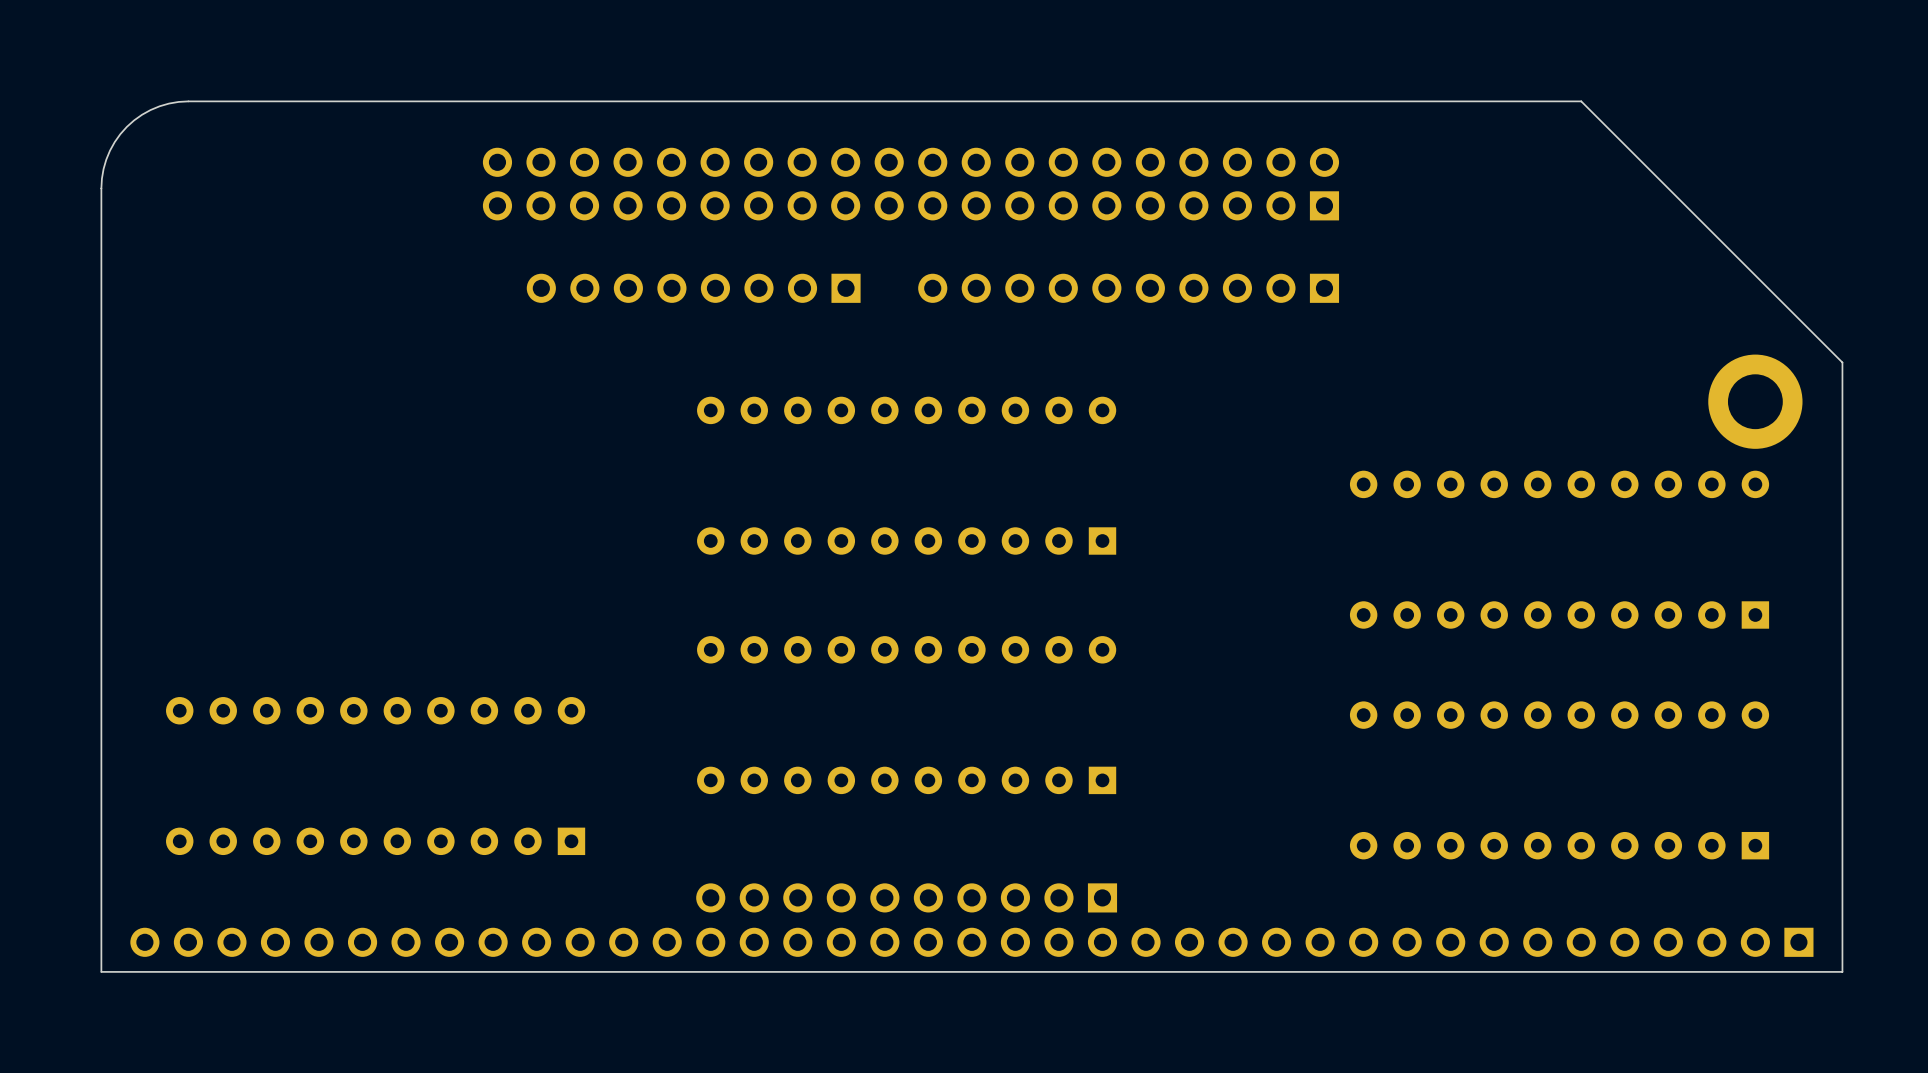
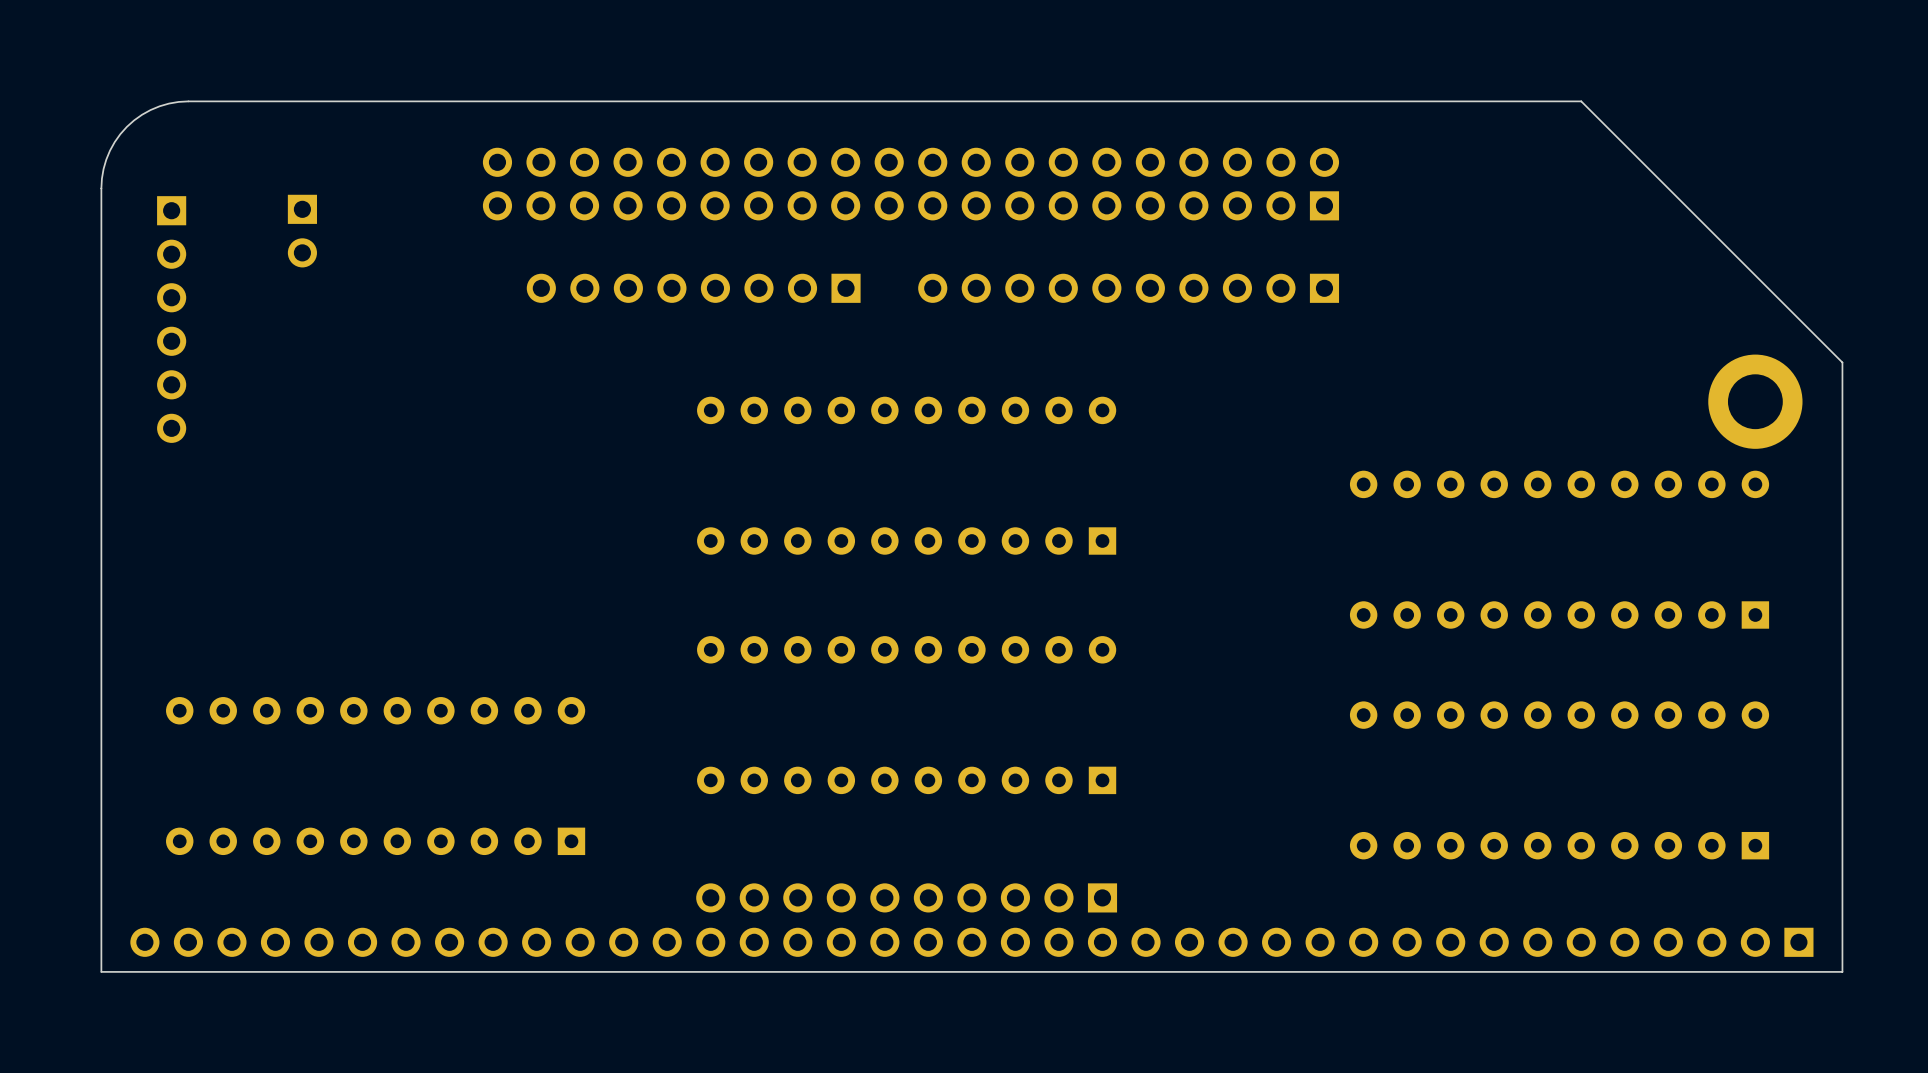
part: none -> (302, 231)
part: none -> (171, 319)

